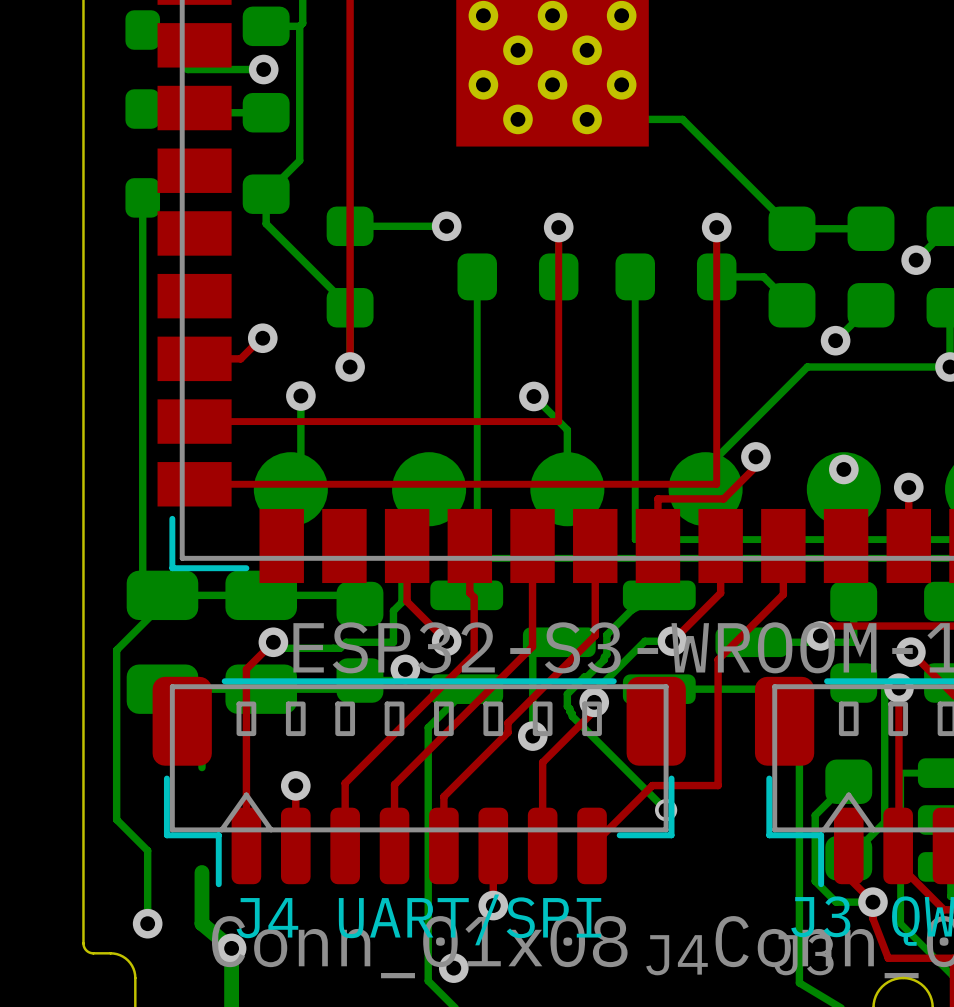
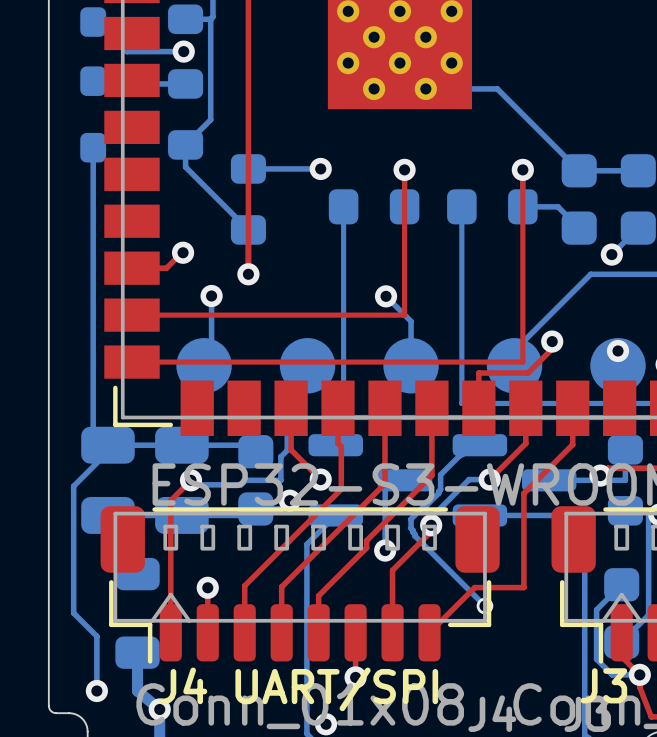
part: none -> (137, 613)

